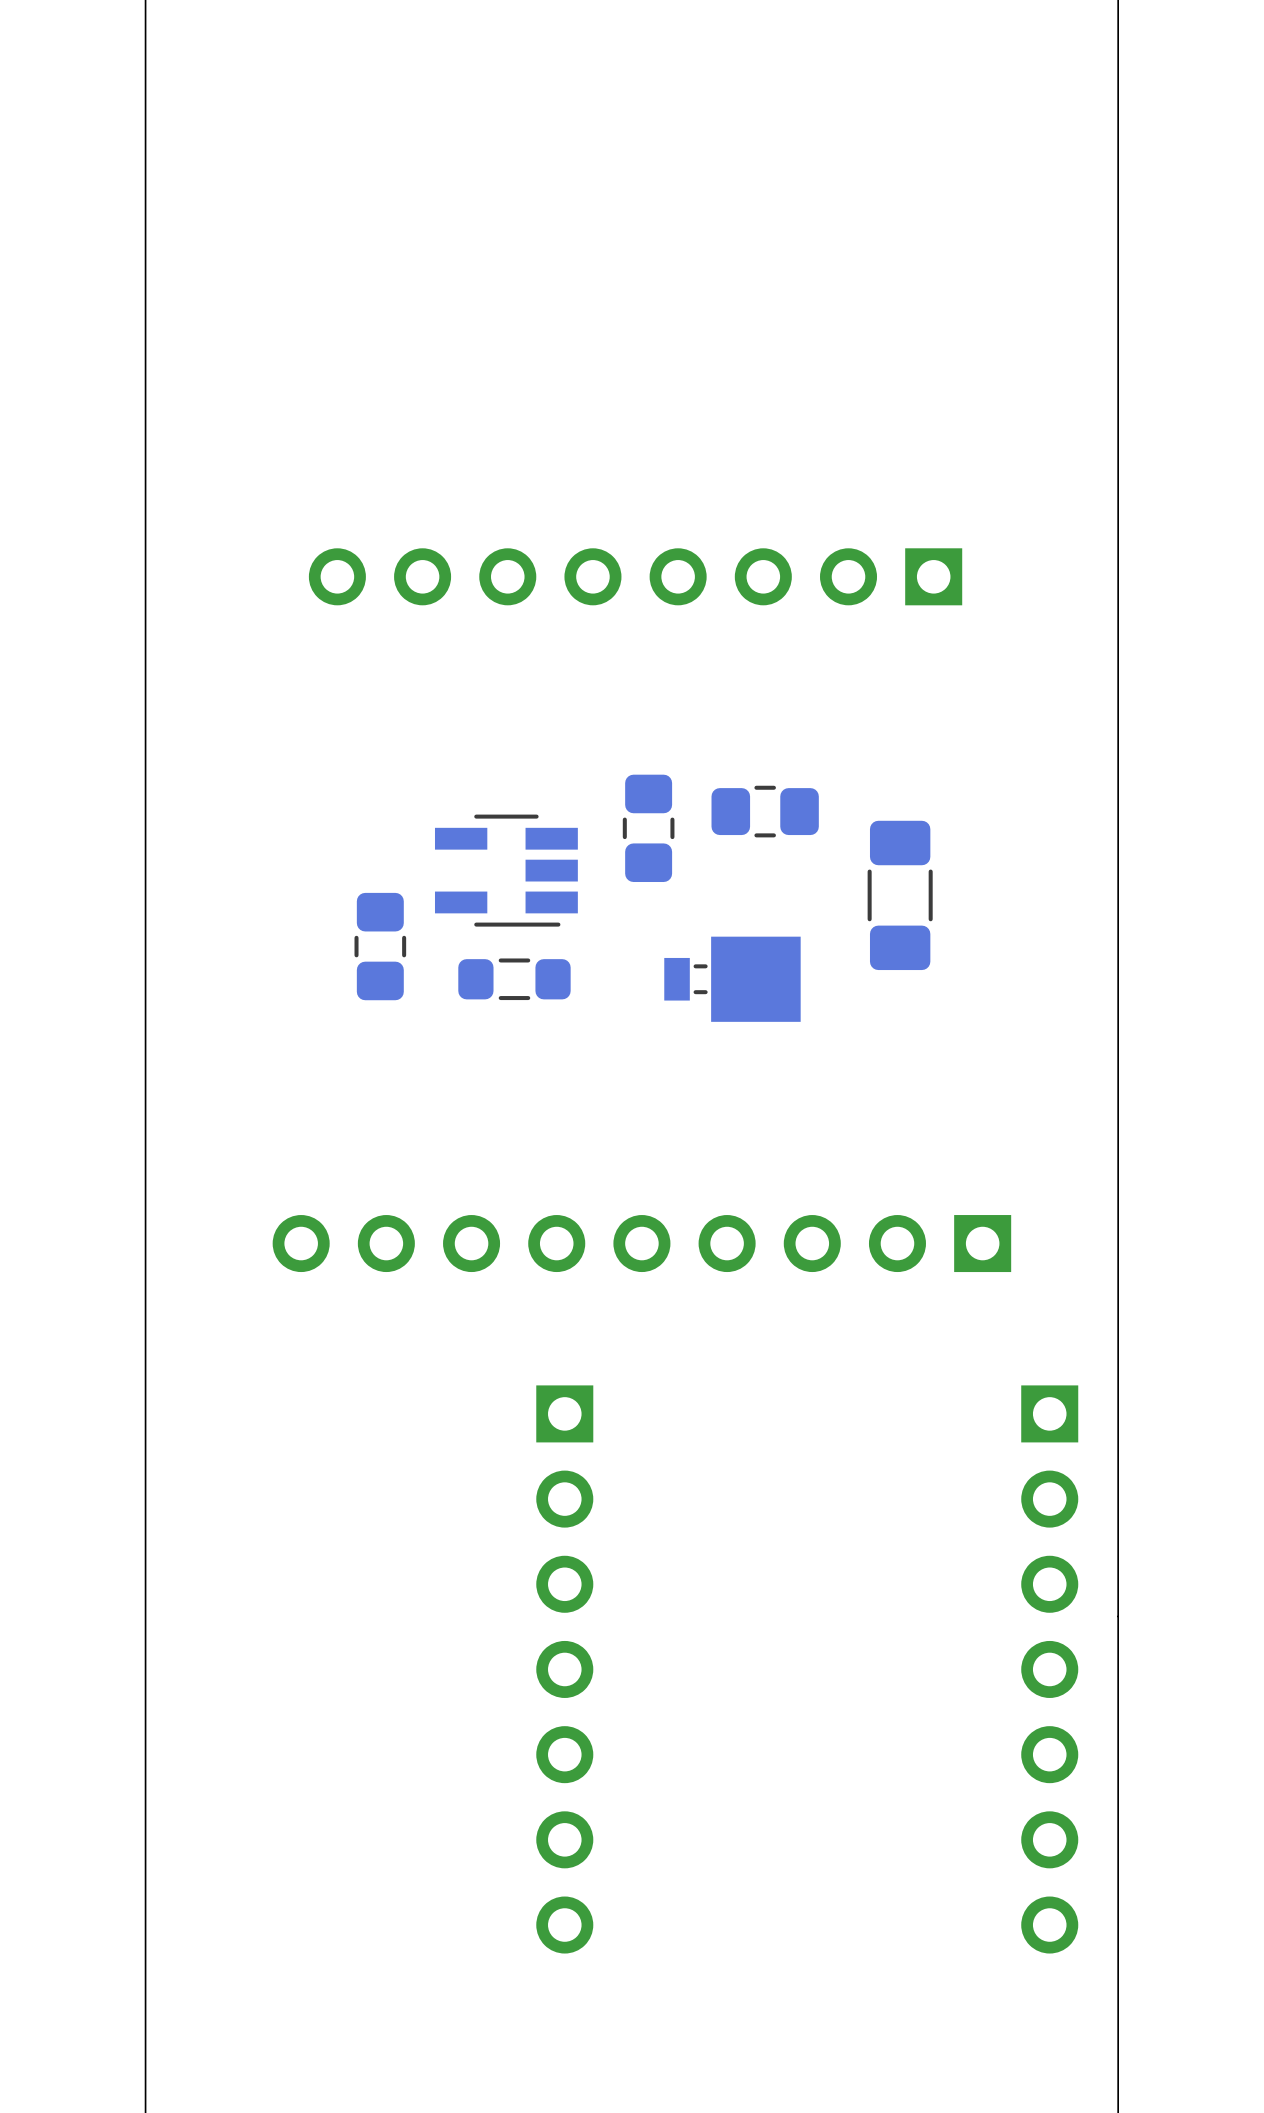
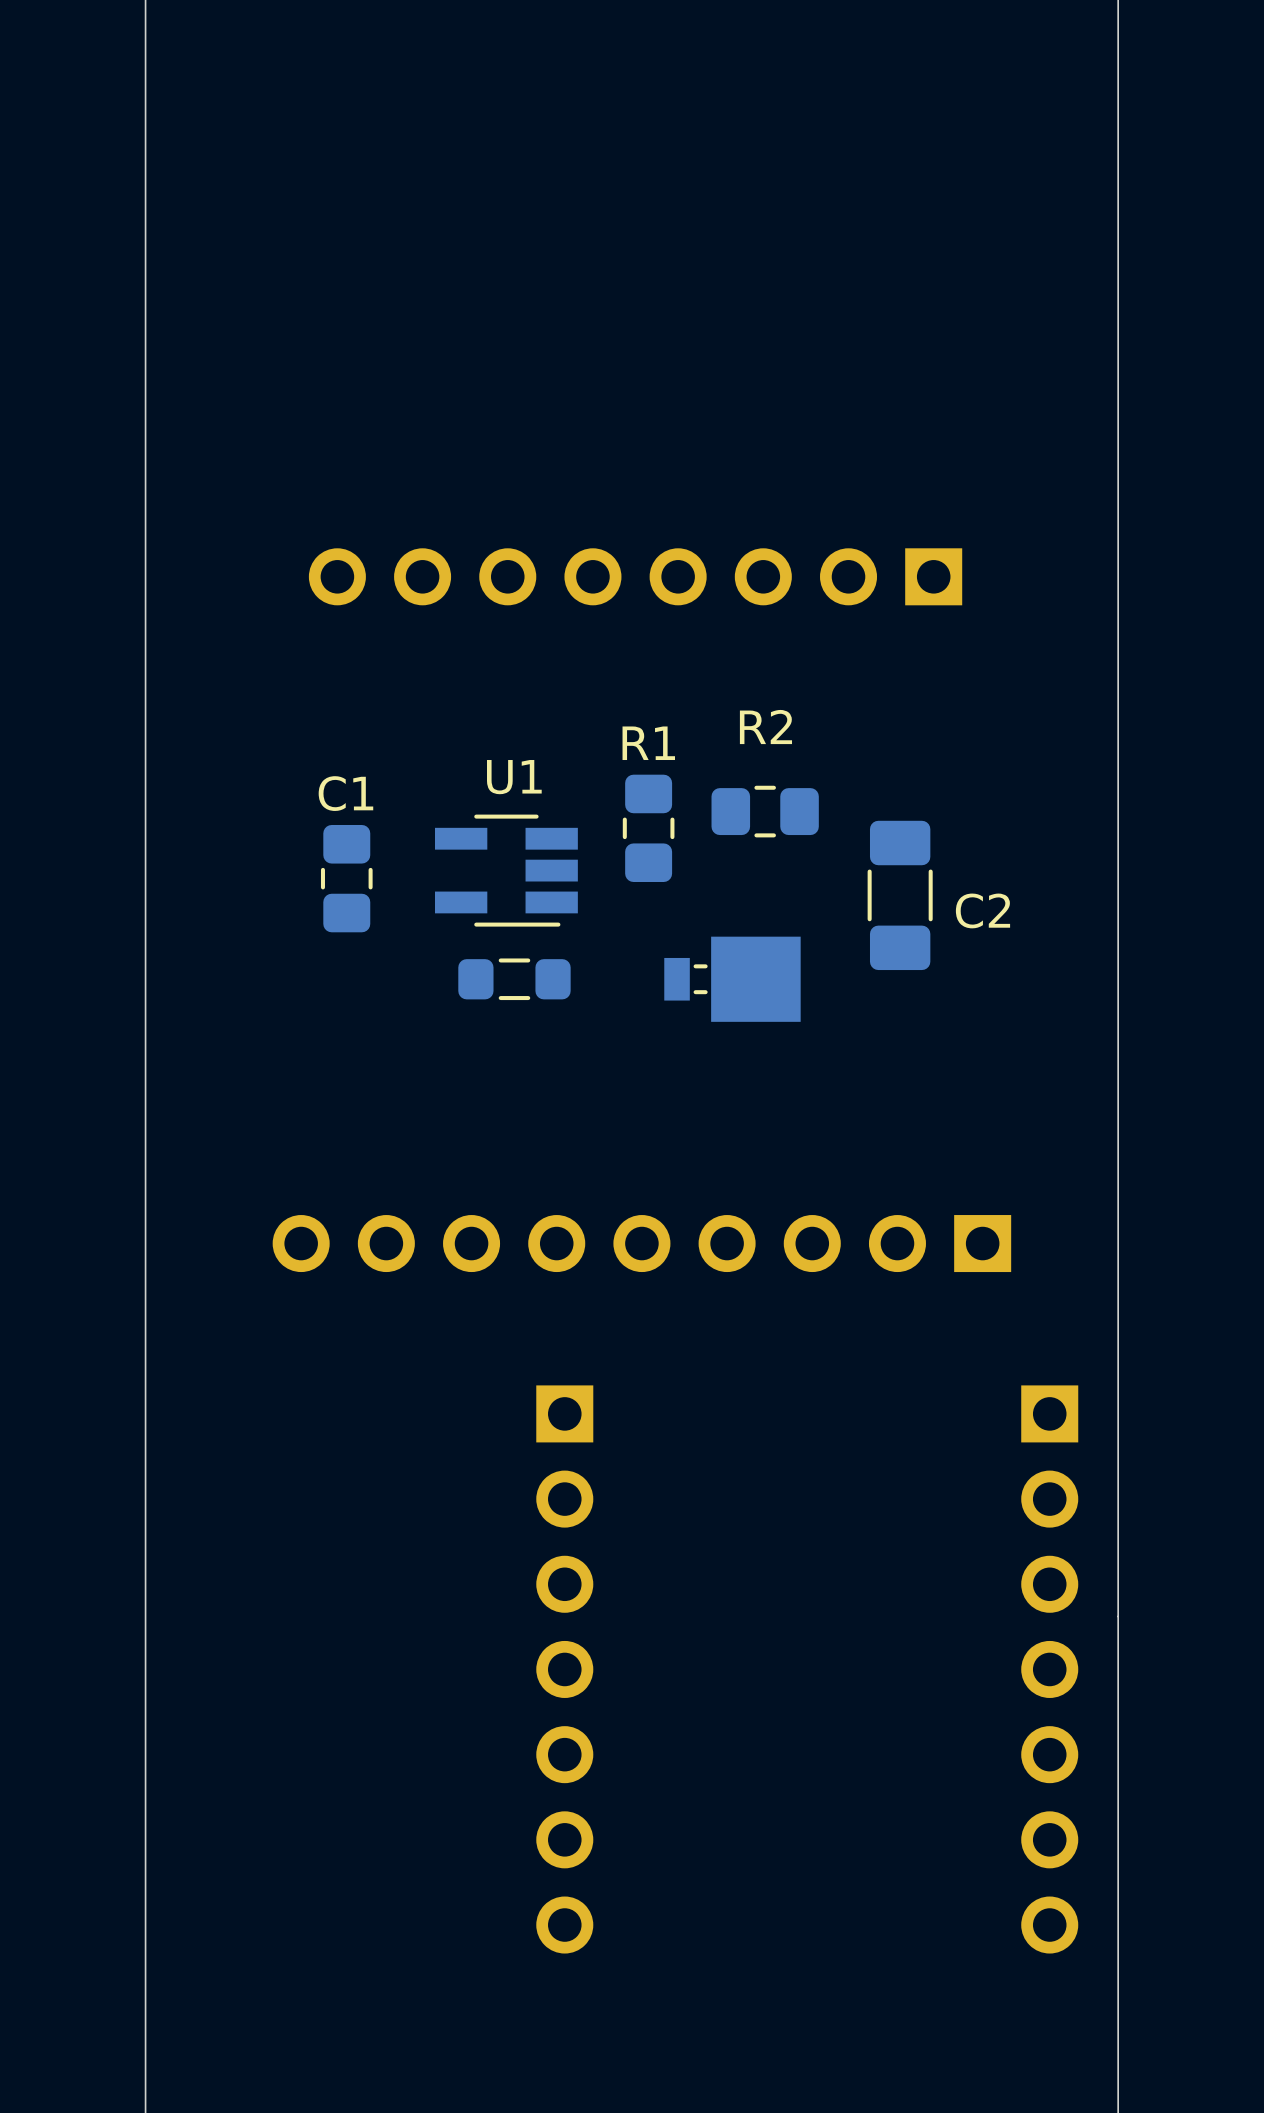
R2 name: none -> R2 (765, 727)
R1 name: none -> R1 (648, 743)
U1 name: none -> U1 (514, 777)
C1: none -> (346, 878)
C2 name: none -> C2 (982, 910)
part: (380, 946) -> none

